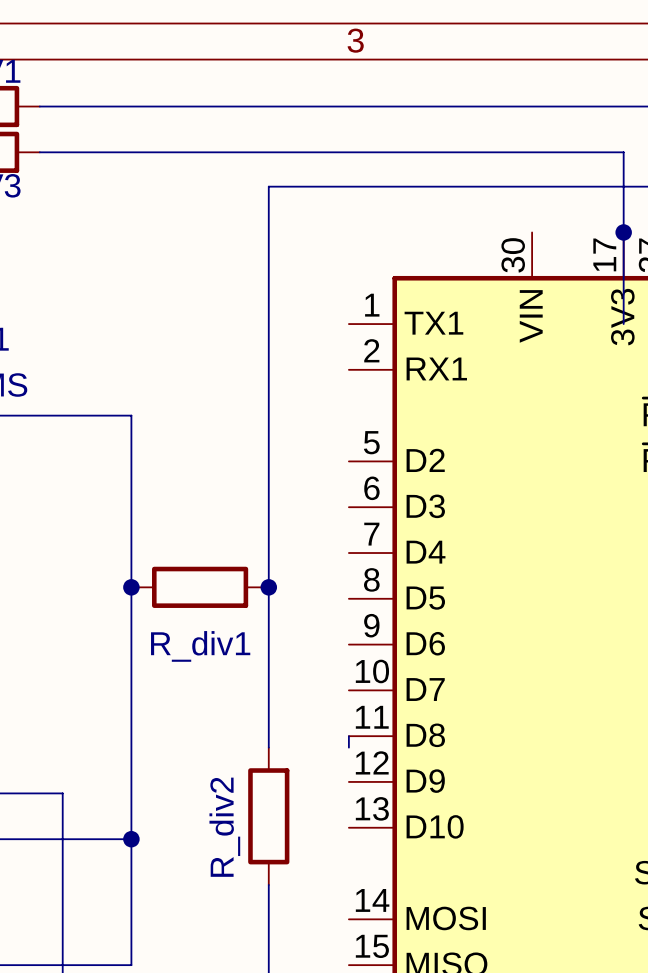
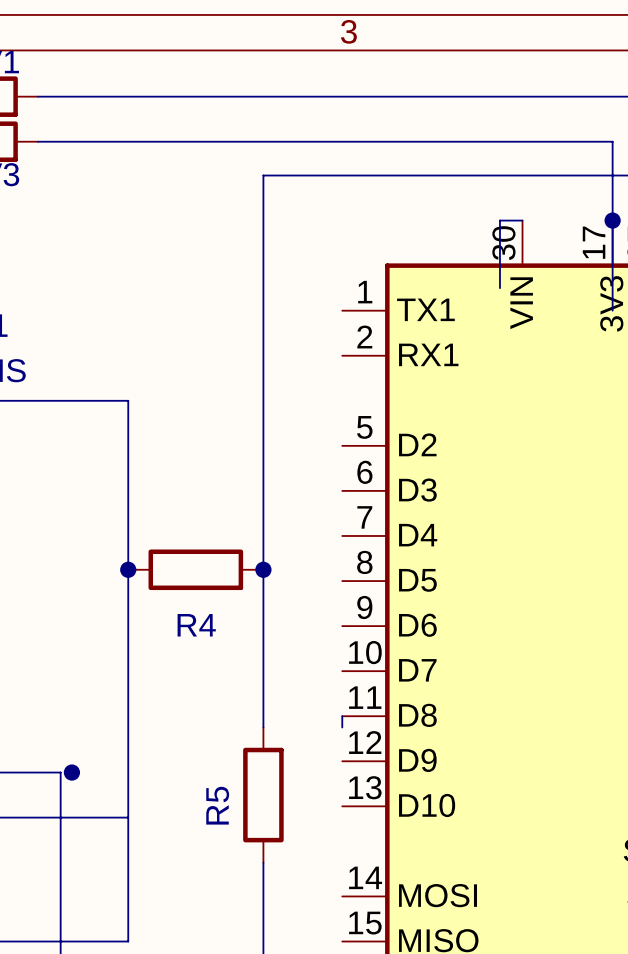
wire: none -> (522, 220) (499, 220) (499, 288)
R_div1 name: R_div1 (200, 646) -> R4 (196, 625)
R_div2 name: R_div2 (224, 827) -> R5 (217, 805)
junction position: (131, 839) -> (71, 772)

